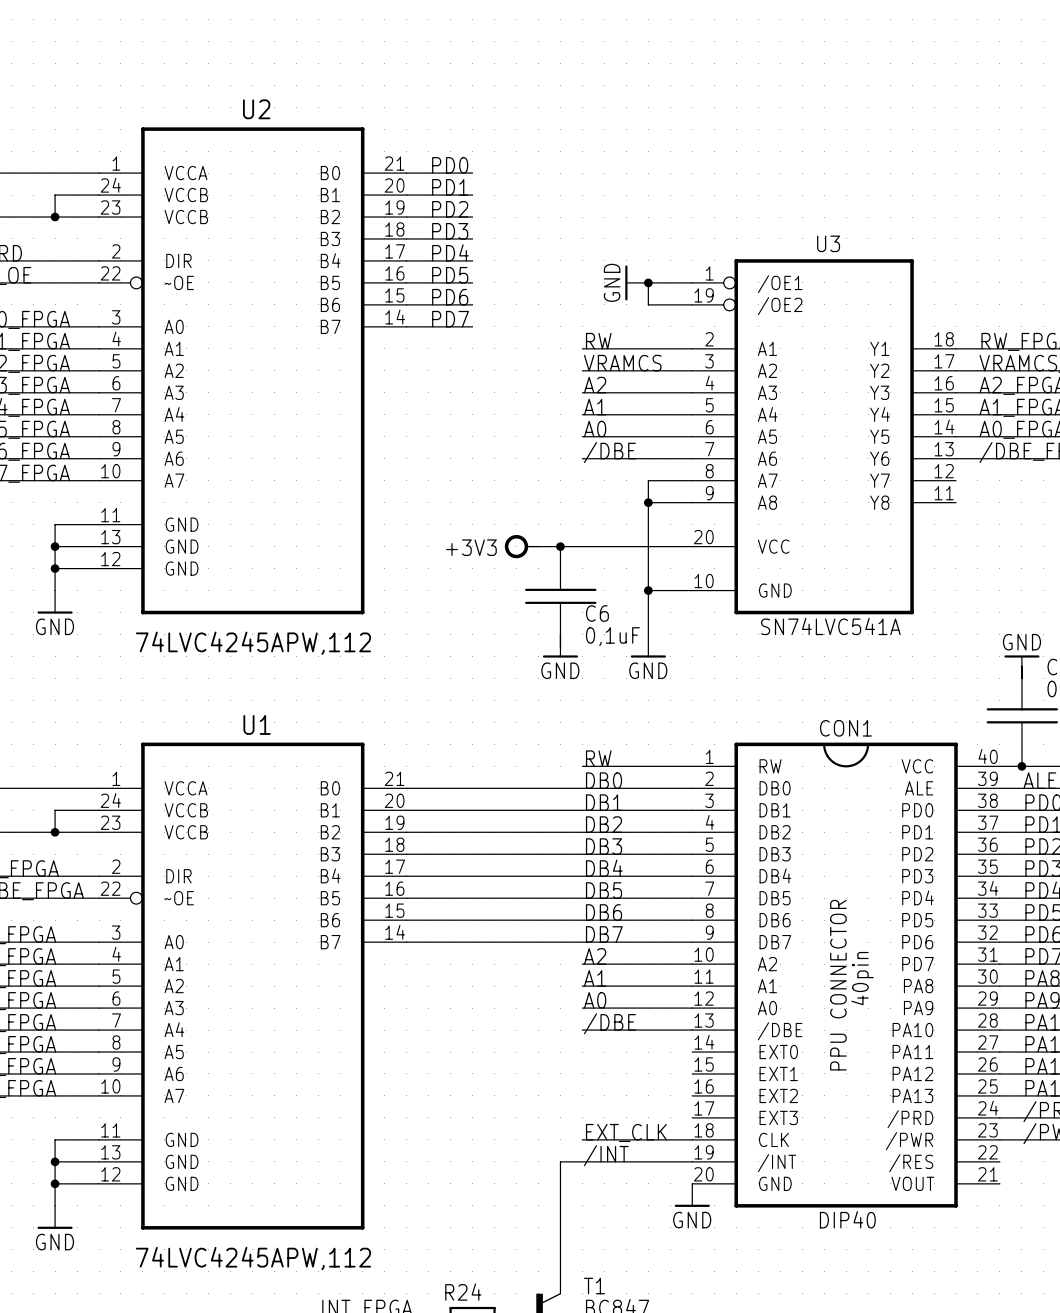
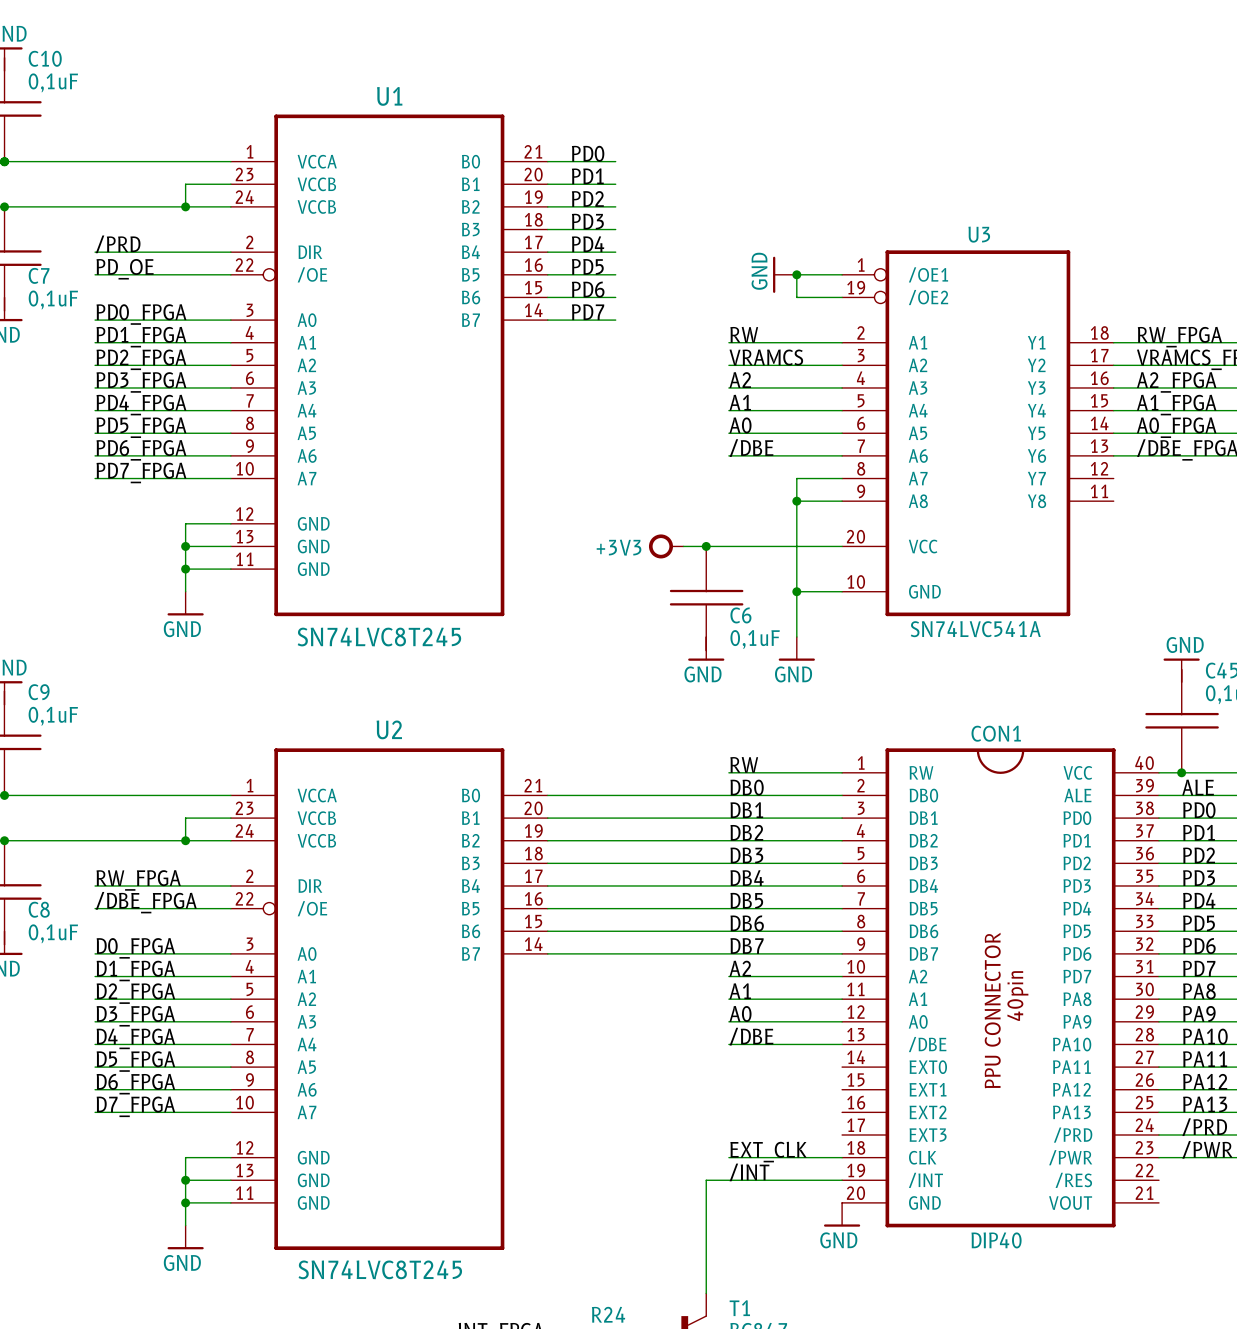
U2 pin number: 24 (110, 185) -> 23 (244, 808)
U2 pin number: 23 (110, 207) -> 24 (244, 830)
U2 pin name: ~OE (179, 282) -> /OE (312, 908)
U2 position: (252, 370) -> (389, 999)
U2 pin number: 11 (110, 515) -> 12 (244, 1147)
U2 pin number: 12 (110, 559) -> 11 (244, 1193)
U2 value: 74LVC4245APW,112 (253, 643) -> SN74LVC8T245 (380, 1269)
U1 pin number: 24 (110, 800) -> 23 (244, 174)
U1 pin number: 23 (110, 822) -> 24 (244, 197)
U1 pin name: ~OE (179, 898) -> /OE (312, 274)
U1 position: (252, 986) -> (389, 365)
U1 pin number: 11 (110, 1130) -> 12 (244, 514)
U1 pin number: 12 (110, 1174) -> 11 (244, 559)
U1 value: 74LVC4245APW,112 (253, 1258) -> SN74LVC8T245 (379, 637)

